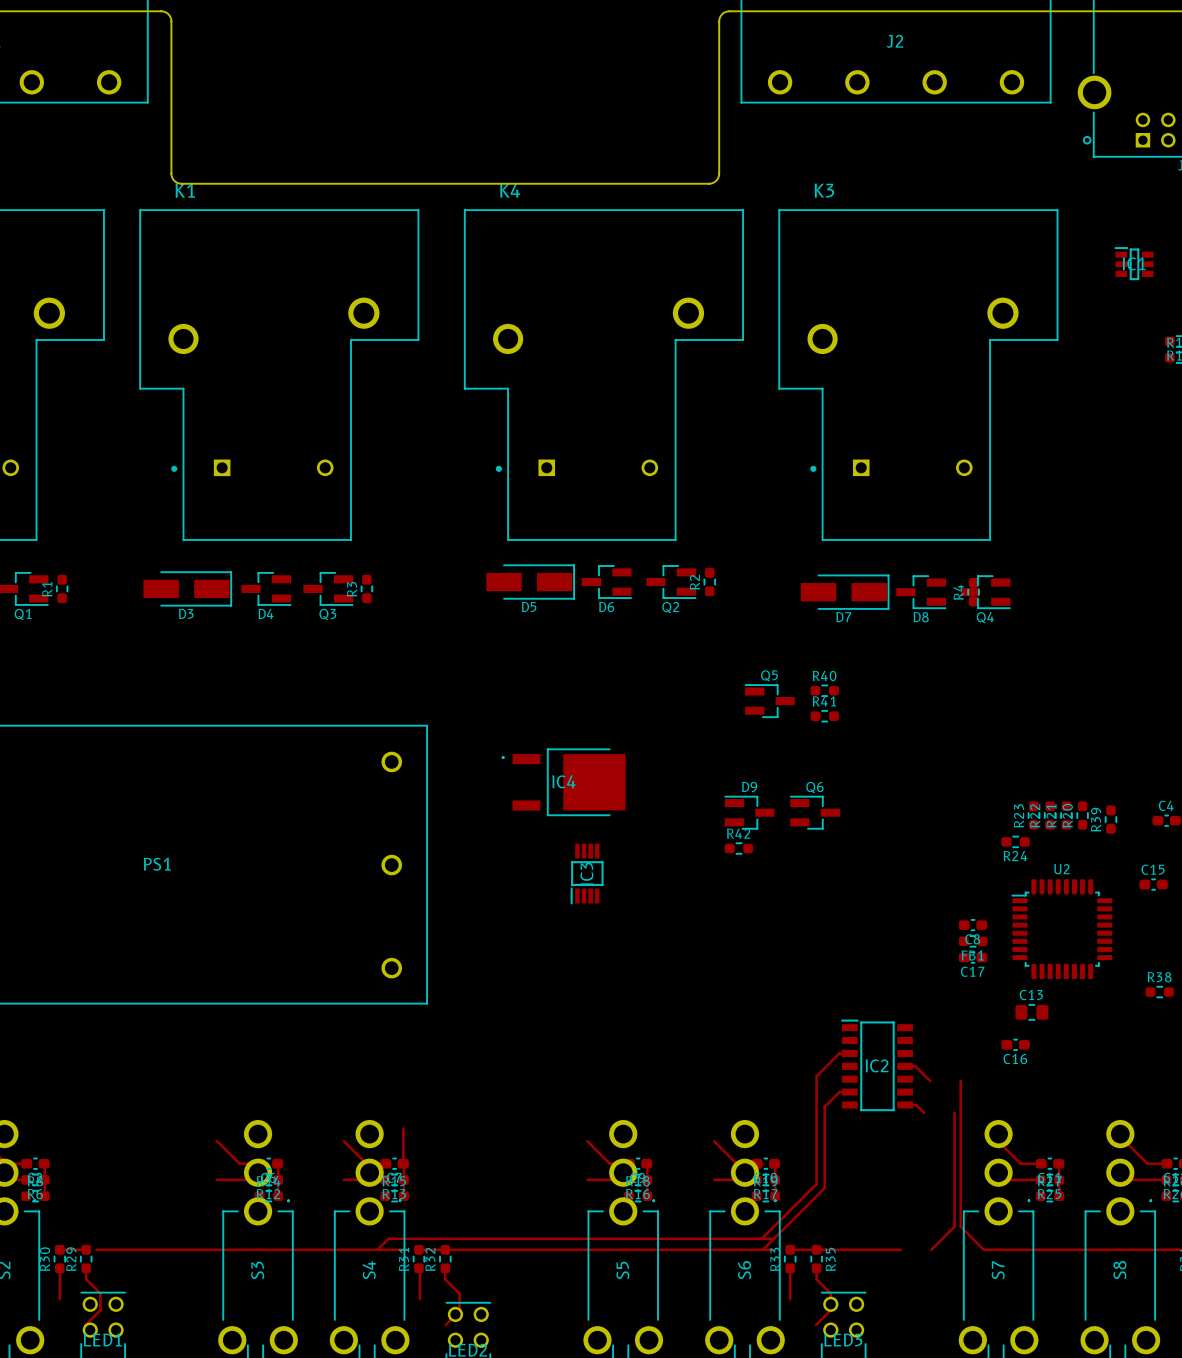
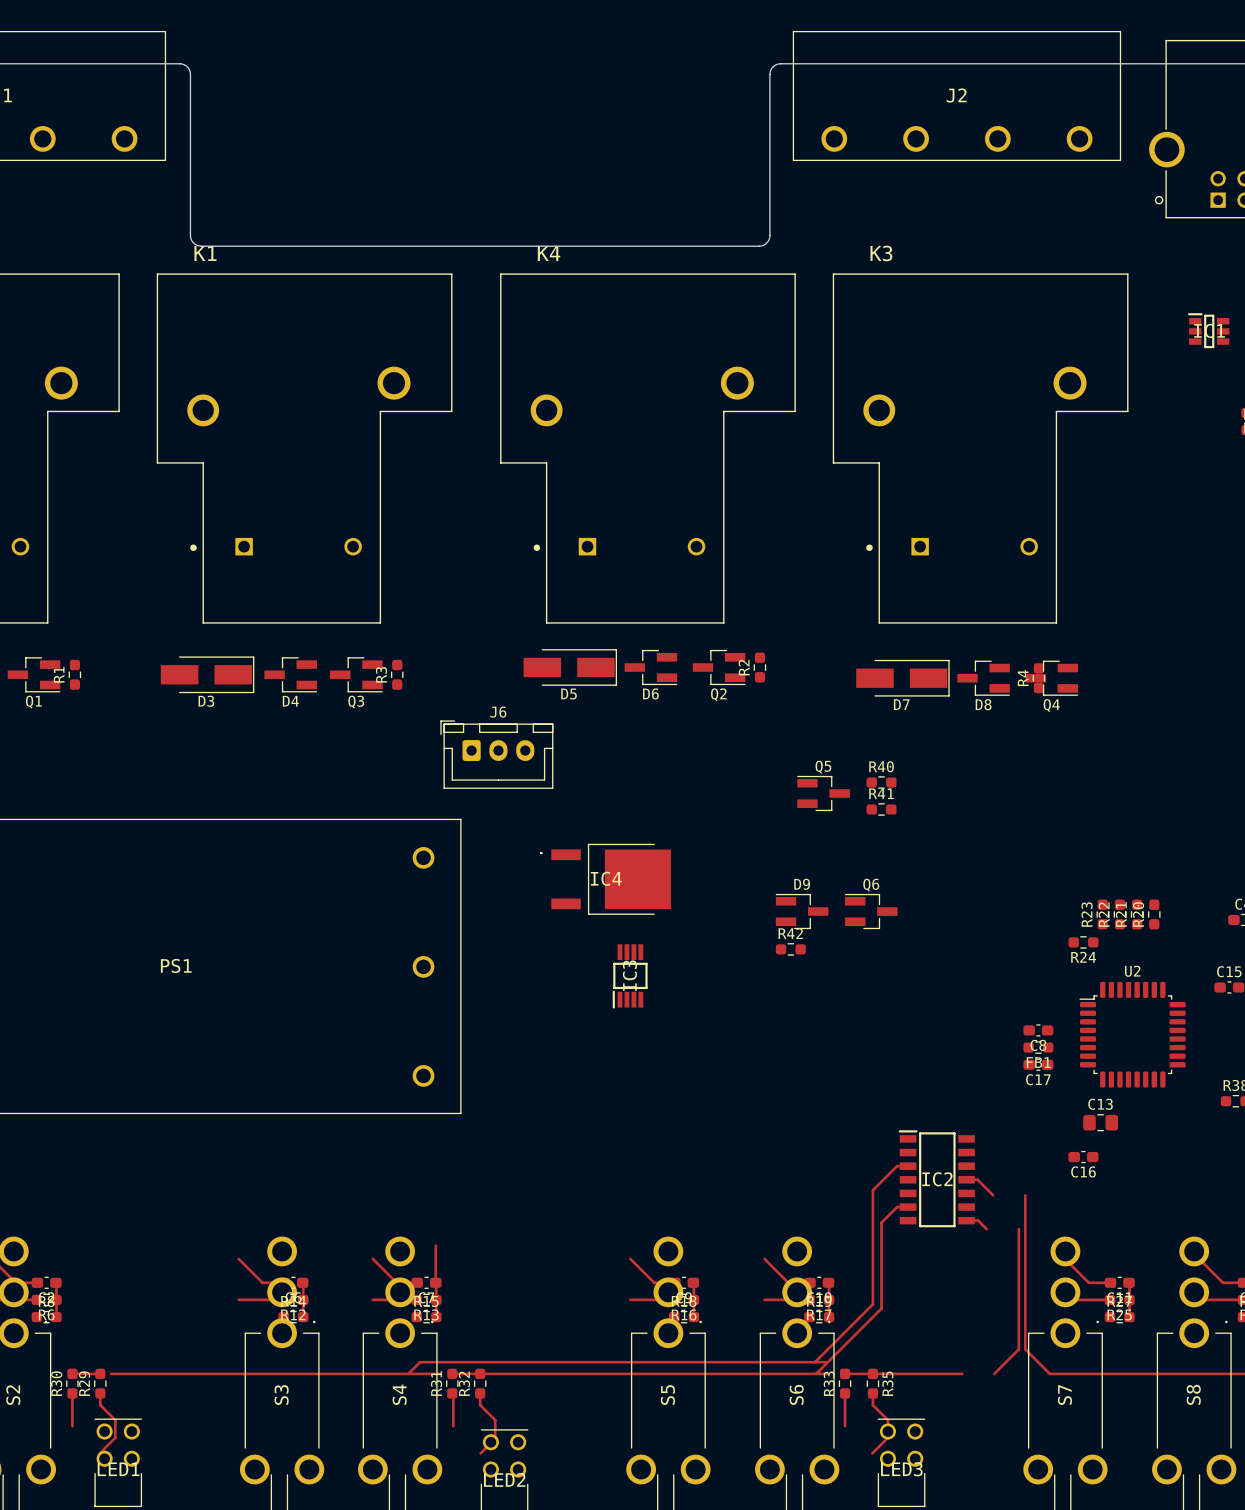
J6: none -> (496, 754)
R39: (1110, 819) -> none

